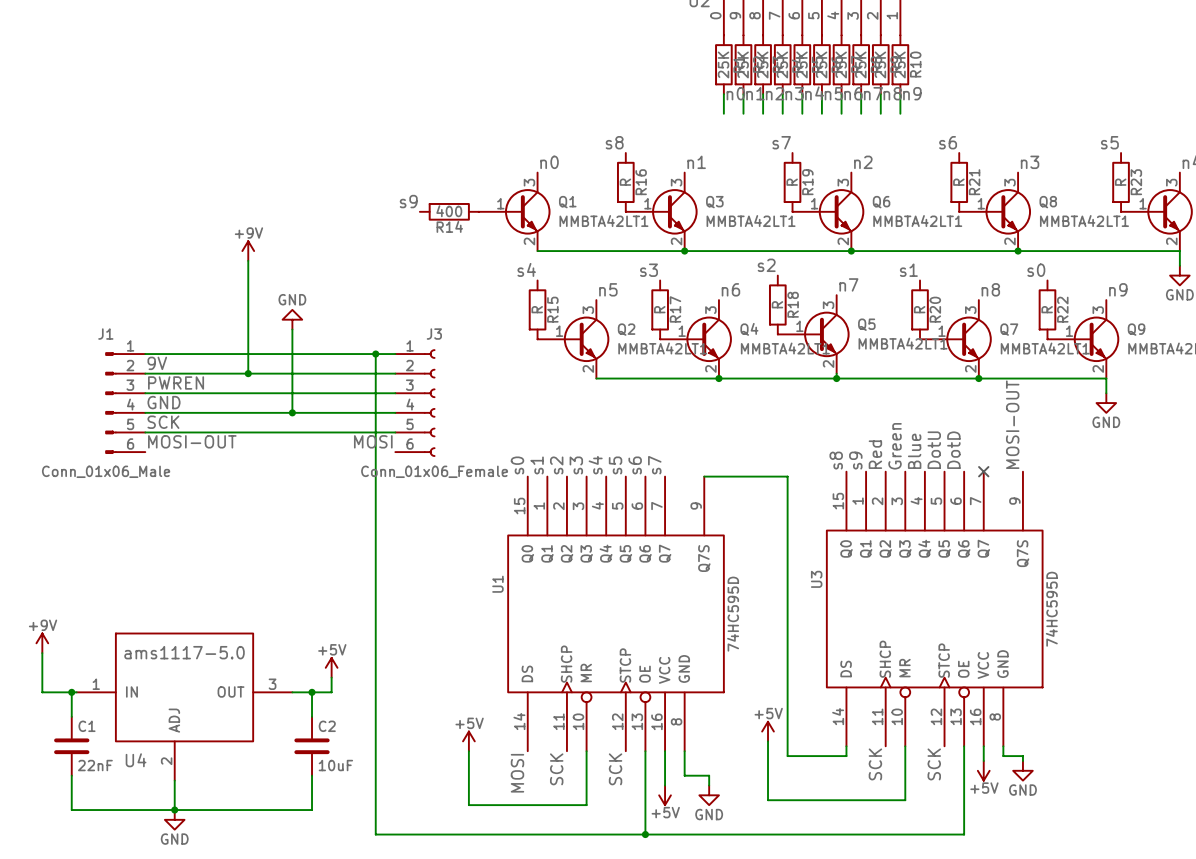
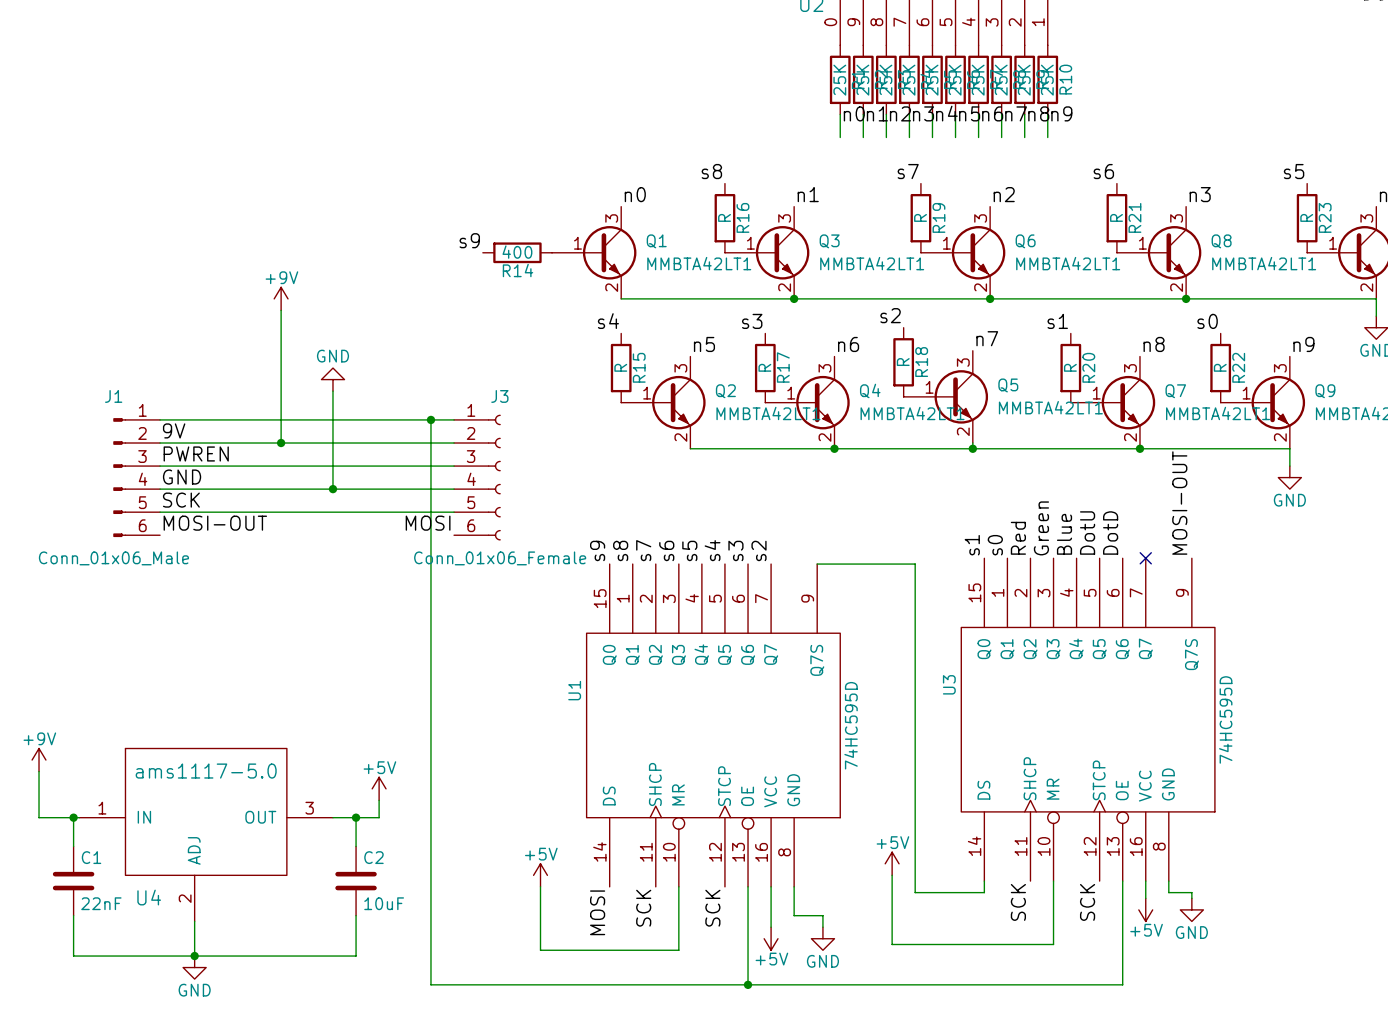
label: s8 (836, 460) -> s1 (972, 545)
label: s9 (855, 460) -> s0 (995, 545)
label: s0 (517, 465) -> s9 (597, 550)
label: s1 (537, 465) -> s8 (620, 550)
label: s2 (556, 465) -> s7 (643, 550)
label: s3 (576, 465) -> s6 (666, 550)
label: s4 (595, 465) -> s5 (689, 550)
label: s5 (615, 465) -> s4 (712, 550)
label: s6 (635, 465) -> s3 (735, 550)
label: s7 (654, 465) -> s2 (759, 550)

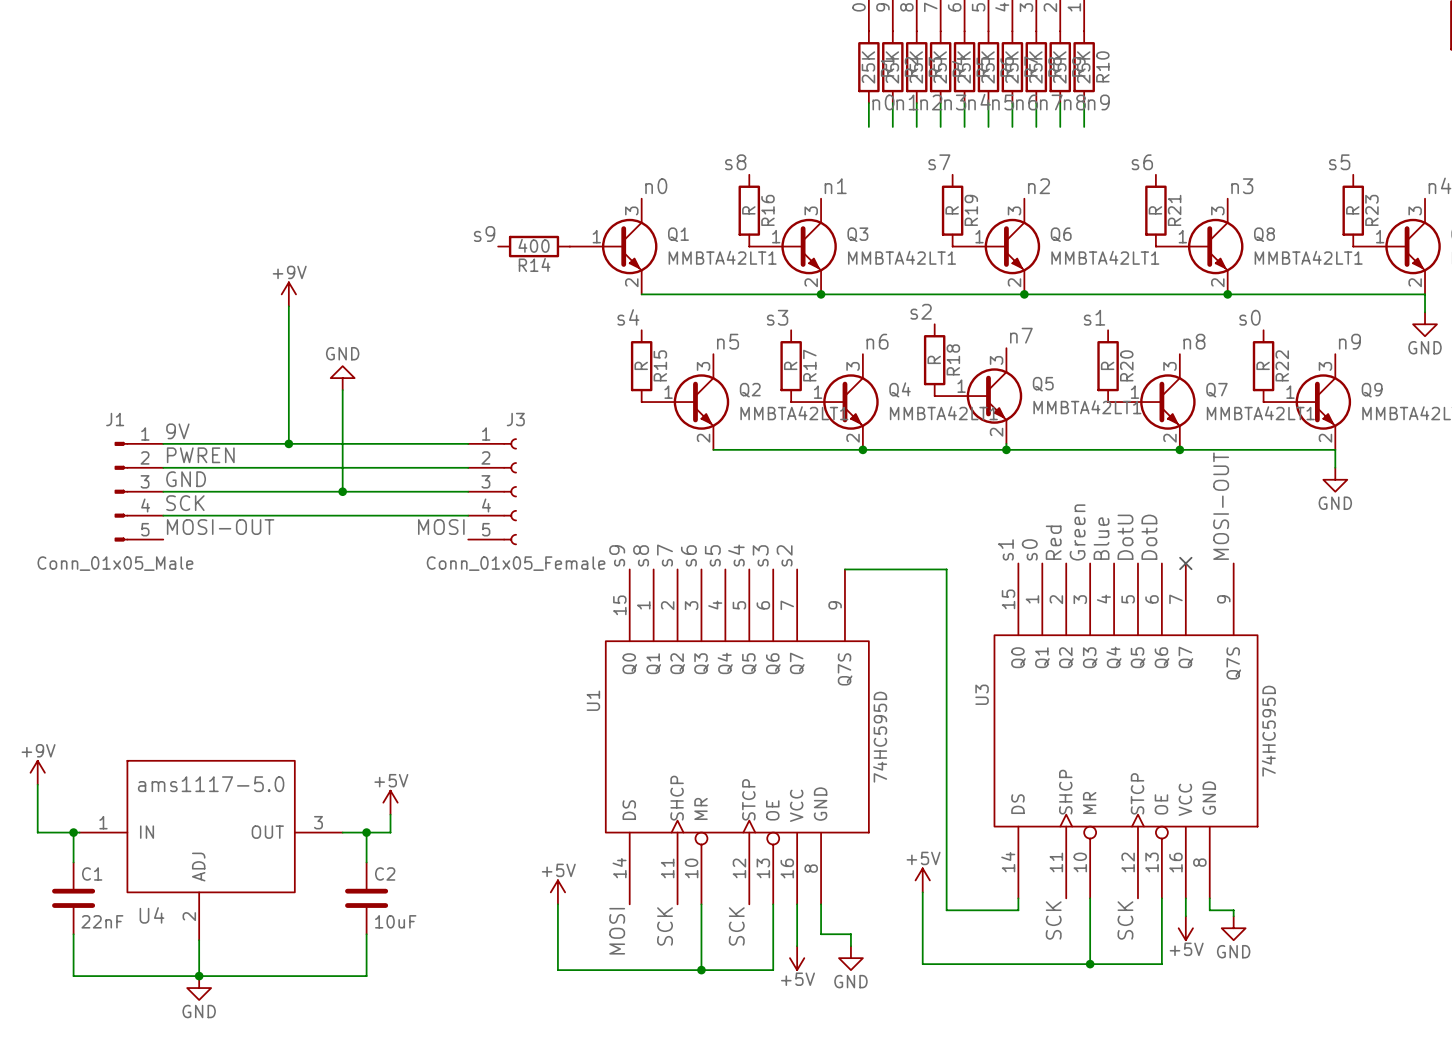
J3 symbol: [454, 414, 501, 541] -> [468, 438, 517, 546]
J1 symbol: [113, 418, 161, 538] -> [114, 441, 164, 542]
wire: (160, 419) (454, 419) -> none
wire: (430, 419) (430, 984) (1122, 984) (1122, 944) -> (1090, 964) (1161, 964)
junction: (430, 419) -> none
J1 value: Conn_01x06_Male (113, 558) -> Conn_01x05_Male (115, 563)
J3 value: Conn_01x06_Female (500, 558) -> Conn_01x05_Female (516, 563)
junction: none -> (1090, 964)
junction: none -> (701, 970)
wire: (748, 950) (748, 984) -> (773, 970) (701, 970)
junction: (748, 984) -> none

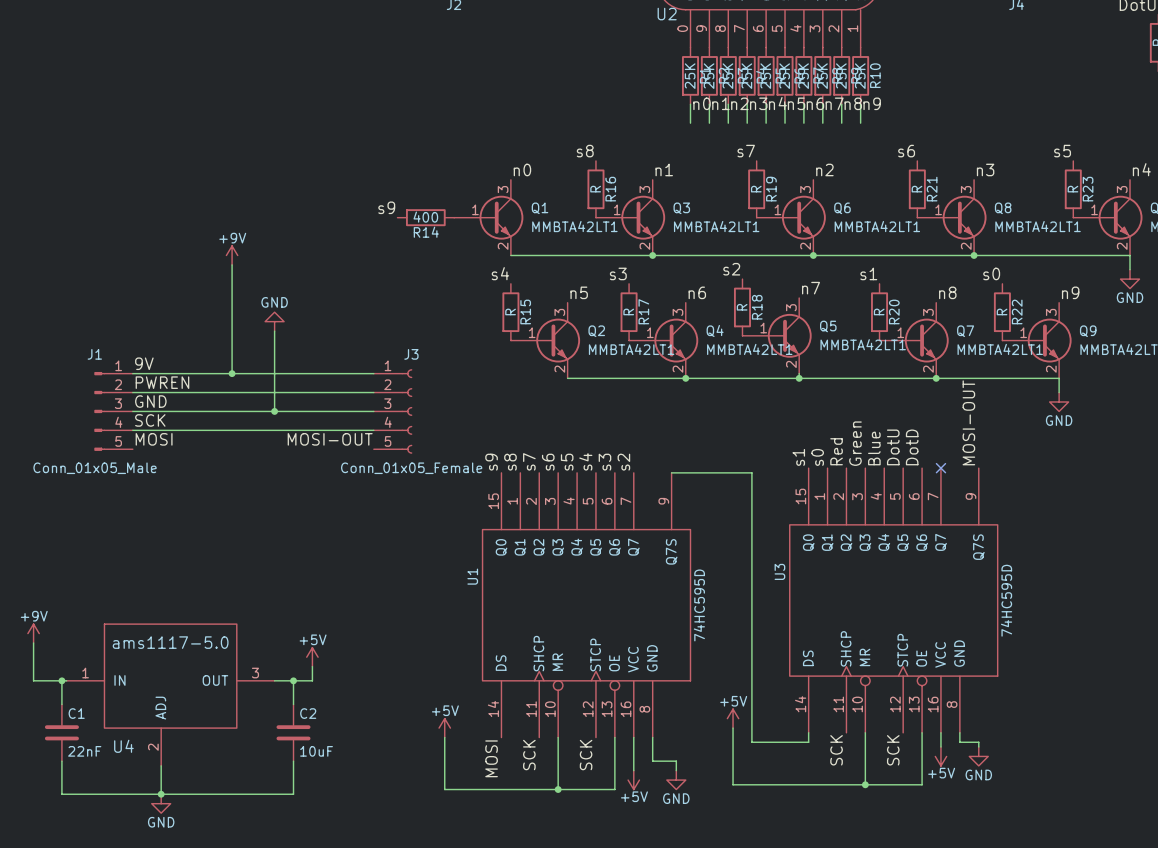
label: MOSI-OUT (220, 527) -> MOSI (154, 439)
label: MOSI (441, 527) -> MOSI-OUT (330, 439)

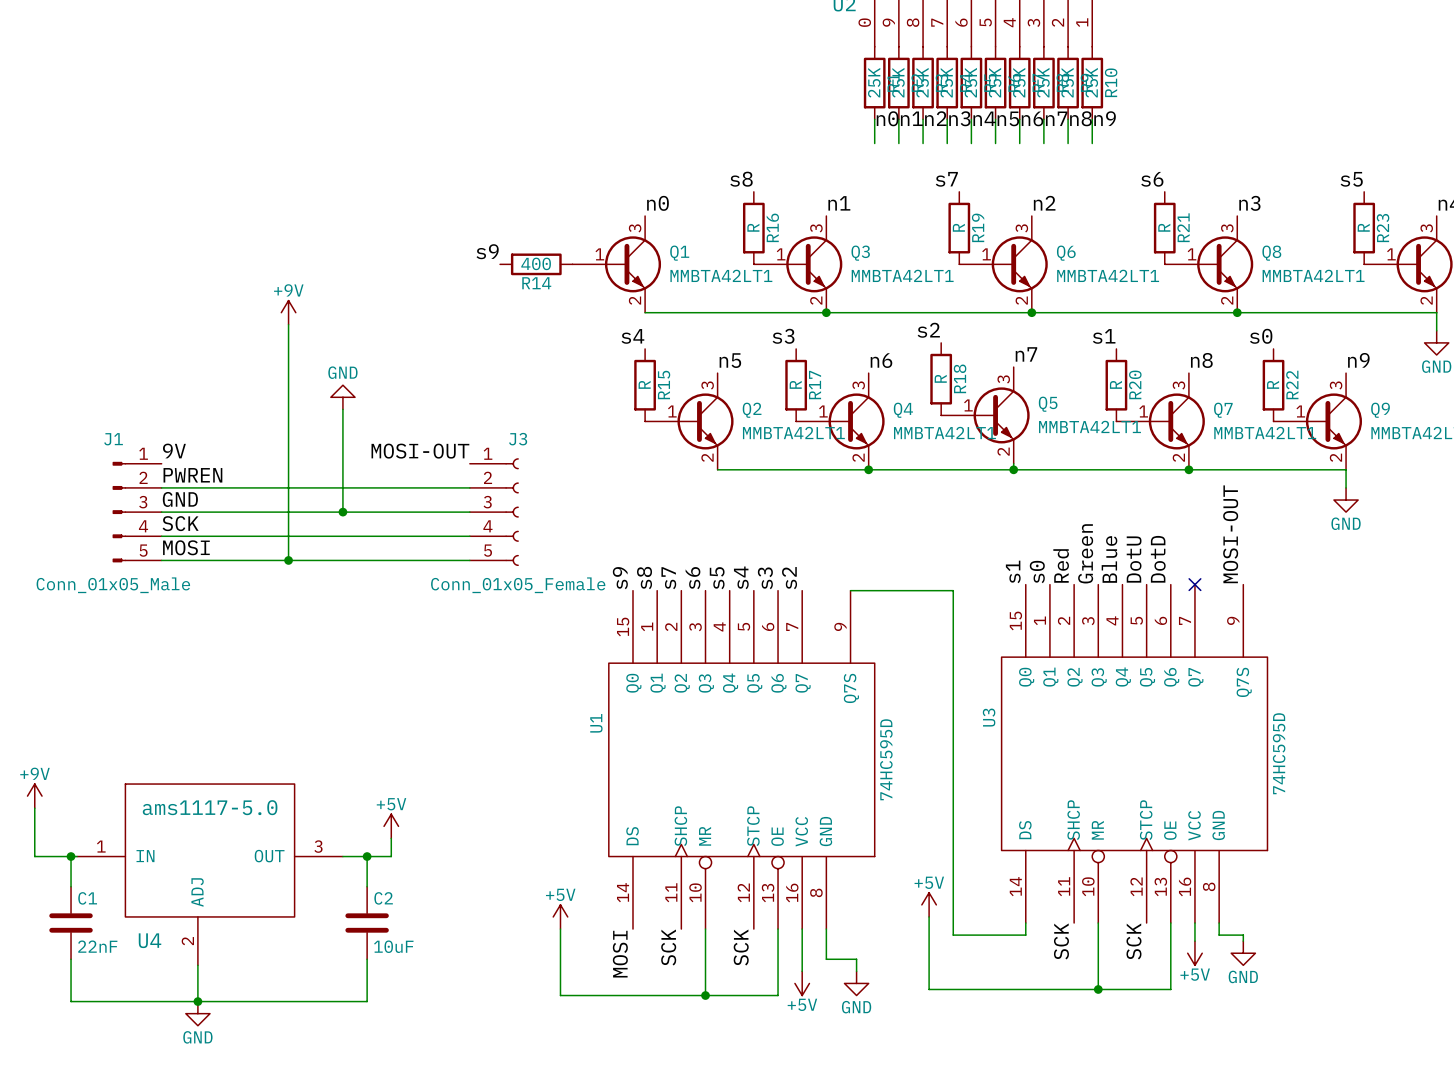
wire: (132, 373) (373, 373) -> (161, 560) (469, 560)
wire: none -> (288, 463) (288, 560)
junction: (232, 373) -> none
label position: MOSI-OUT (330, 439) -> MOSI-OUT (420, 451)
junction: none -> (288, 560)

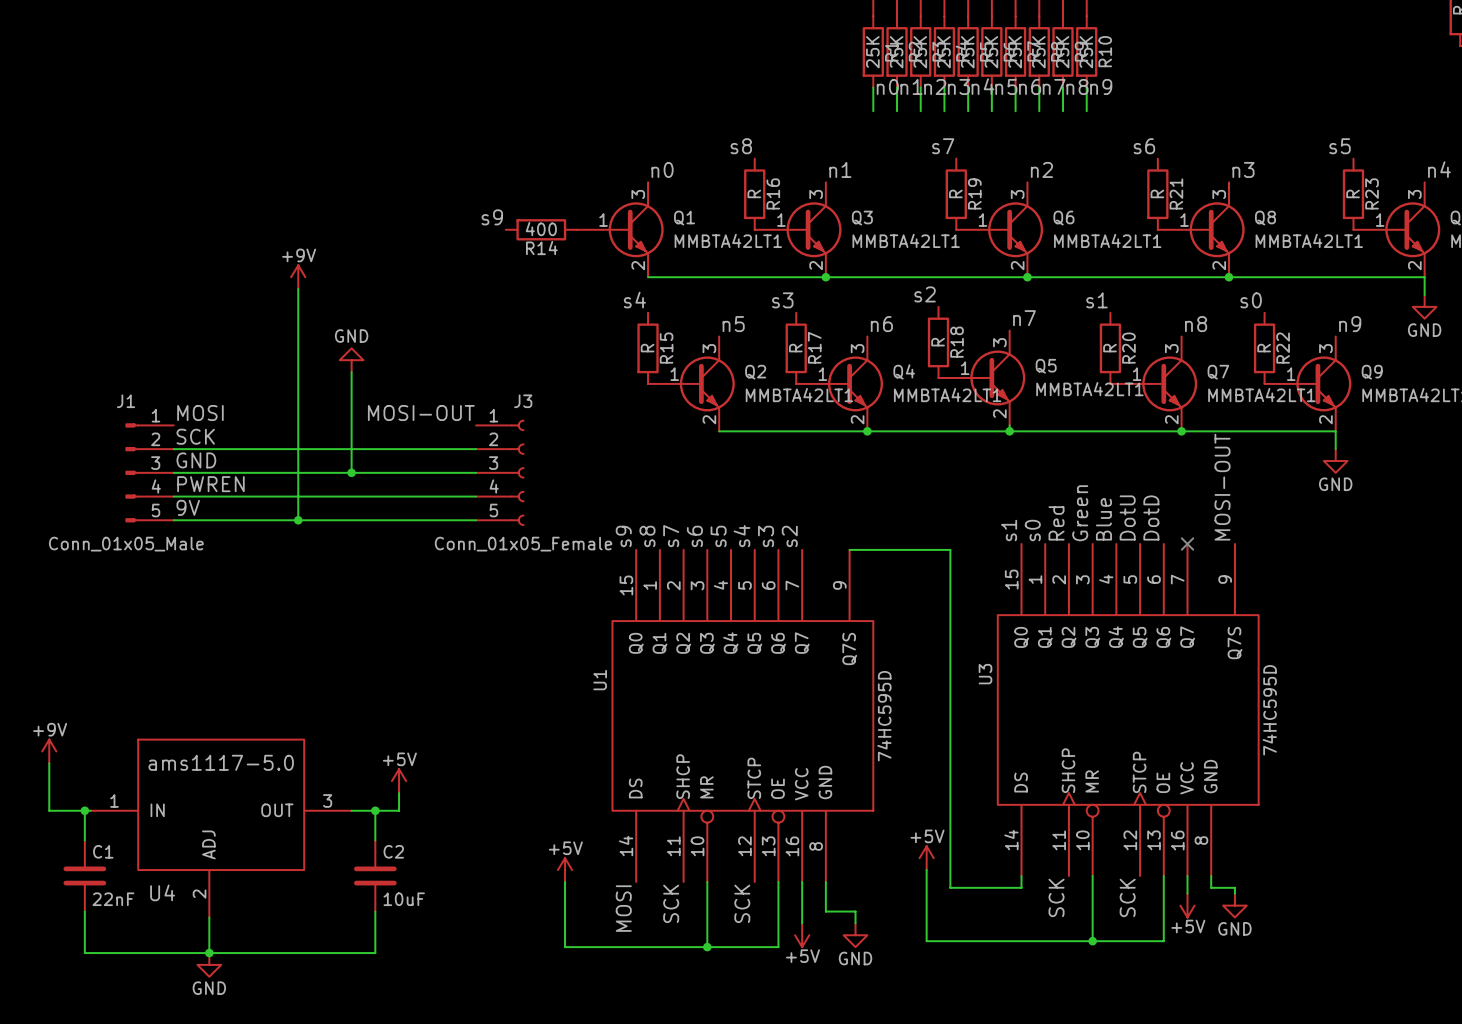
label: 9V (174, 450) -> MOSI (200, 413)
label: PWREN (192, 475) -> SCK (195, 436)
label: SCK (180, 523) -> PWREN (210, 484)
label: MOSI (186, 547) -> 9V (188, 507)

